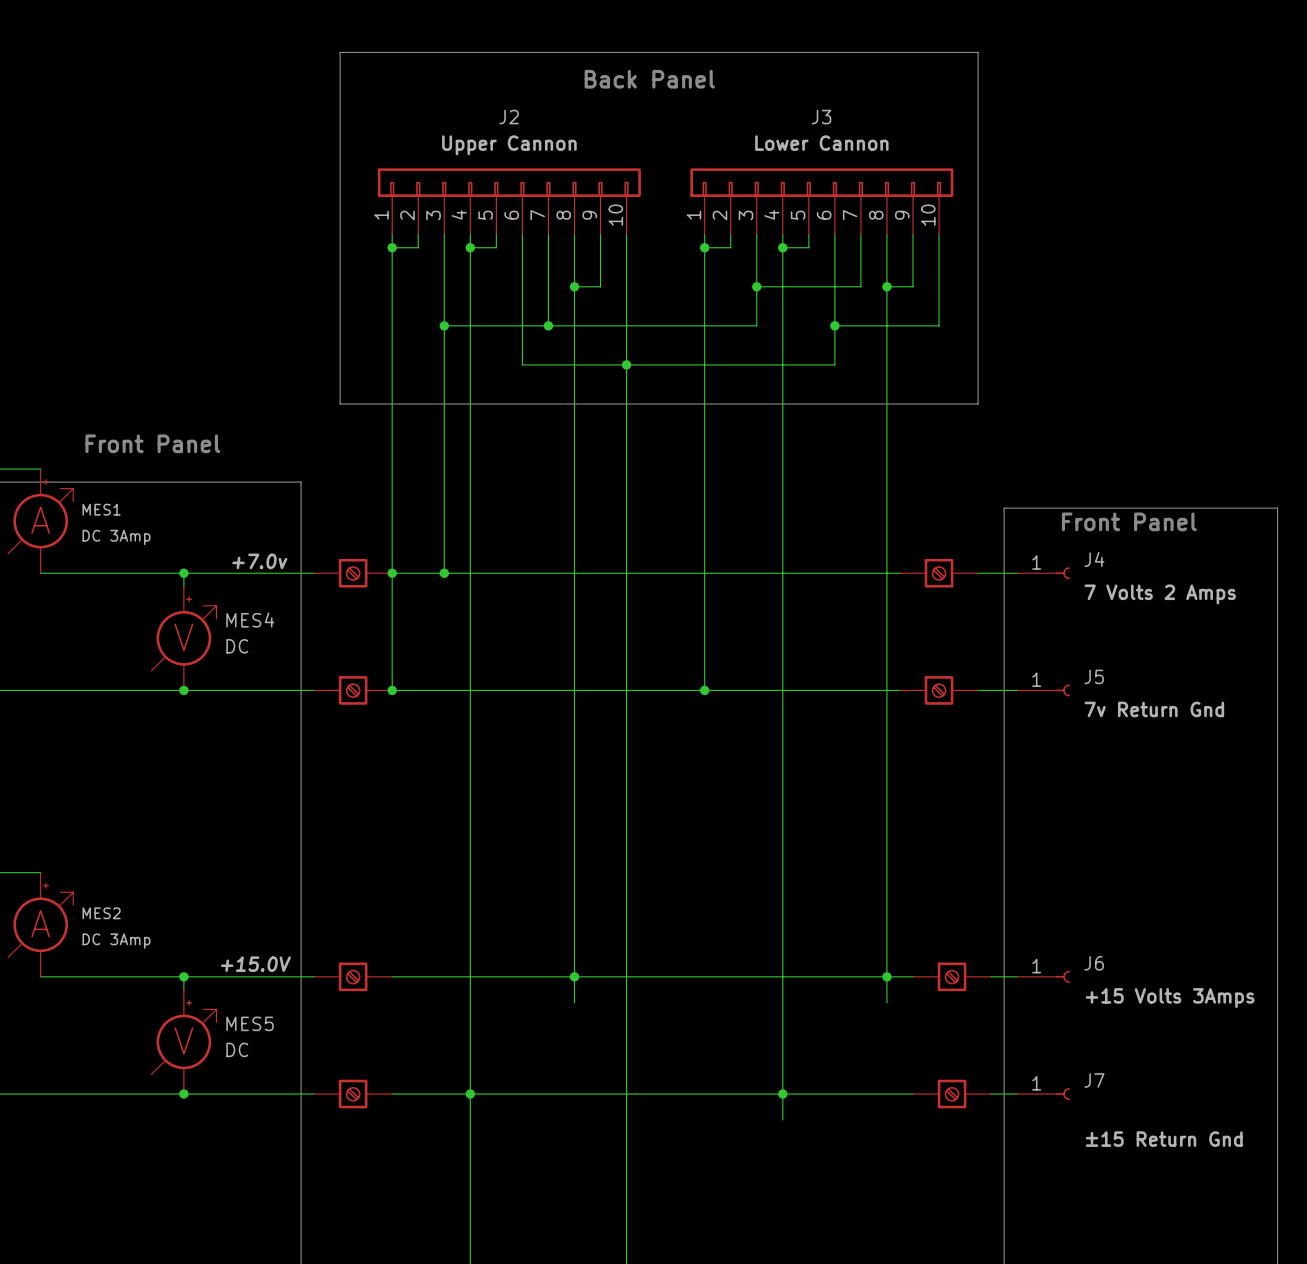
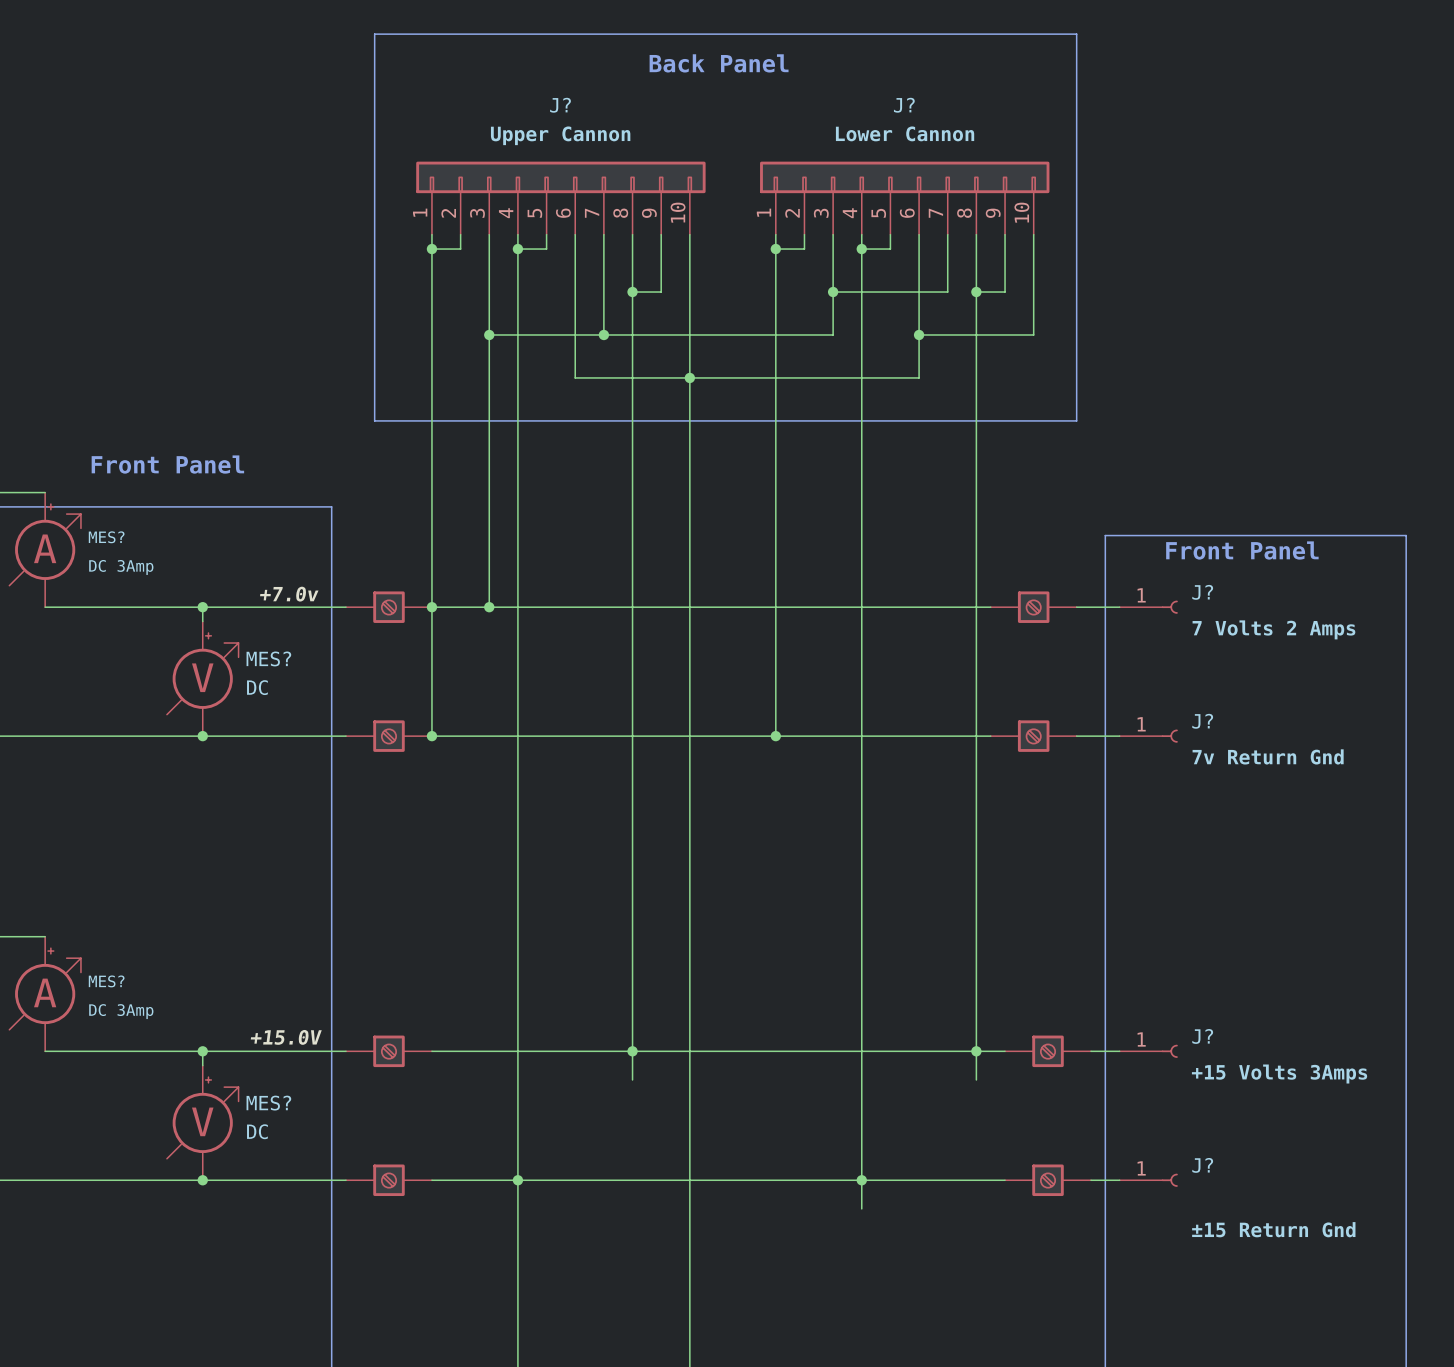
J2 name: J2 (509, 117) -> J? (560, 105)
J3 name: J3 (821, 117) -> J? (904, 105)
MES1 name: MES1 (101, 509) -> MES? (106, 537)
J4 name: J4 (1094, 559) -> J? (1202, 592)
MES4 name: MES4 (250, 619) -> MES? (268, 658)
J5 name: J5 (1094, 676) -> J? (1202, 721)
MES2 name: MES2 (101, 913) -> MES? (106, 981)
J6 name: J6 (1094, 963) -> J? (1202, 1036)
MES5 name: MES5 (250, 1023) -> MES? (268, 1103)
J7 name: J7 (1094, 1080) -> J? (1202, 1165)

